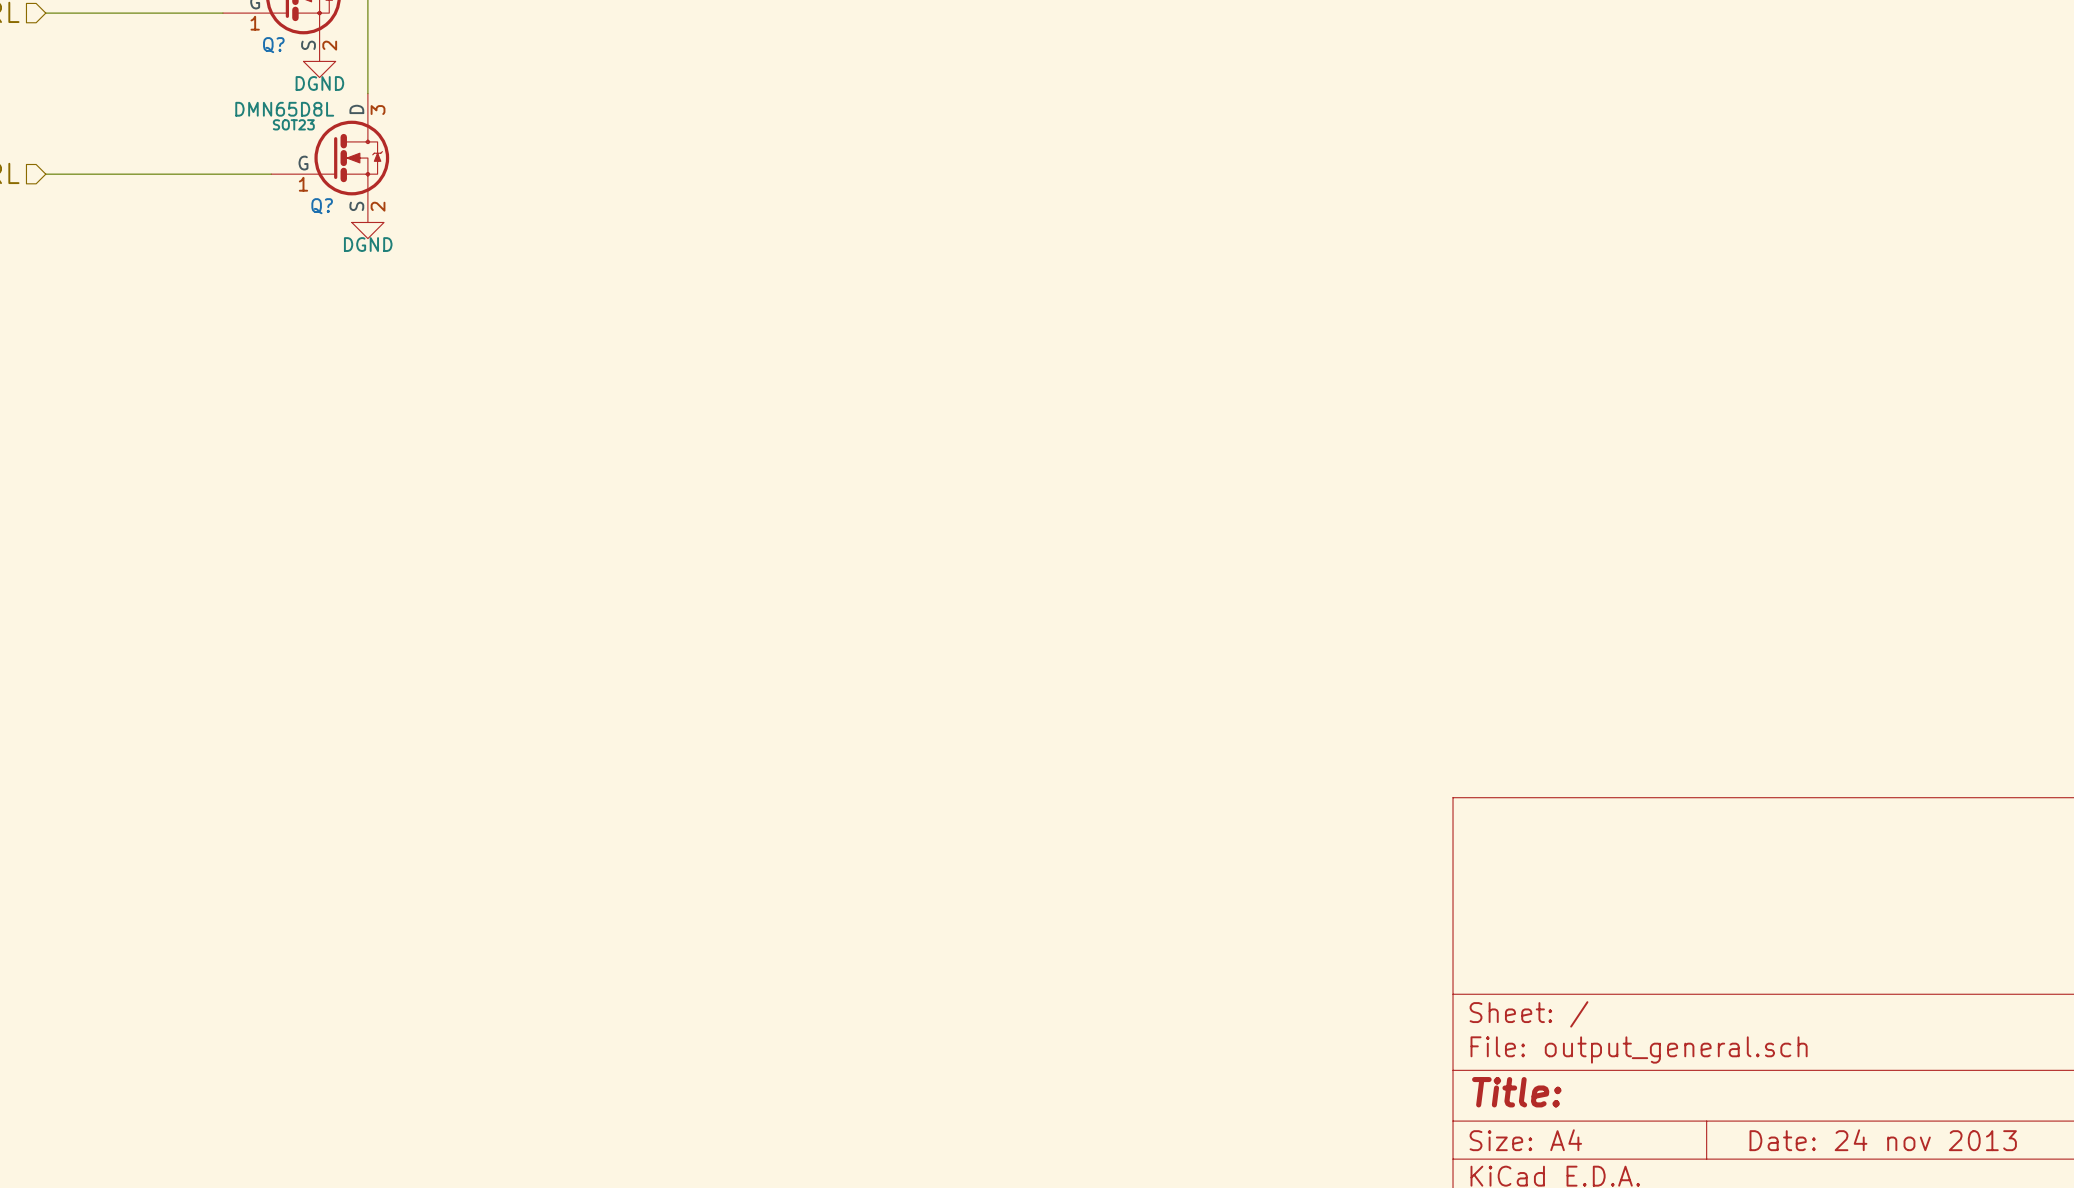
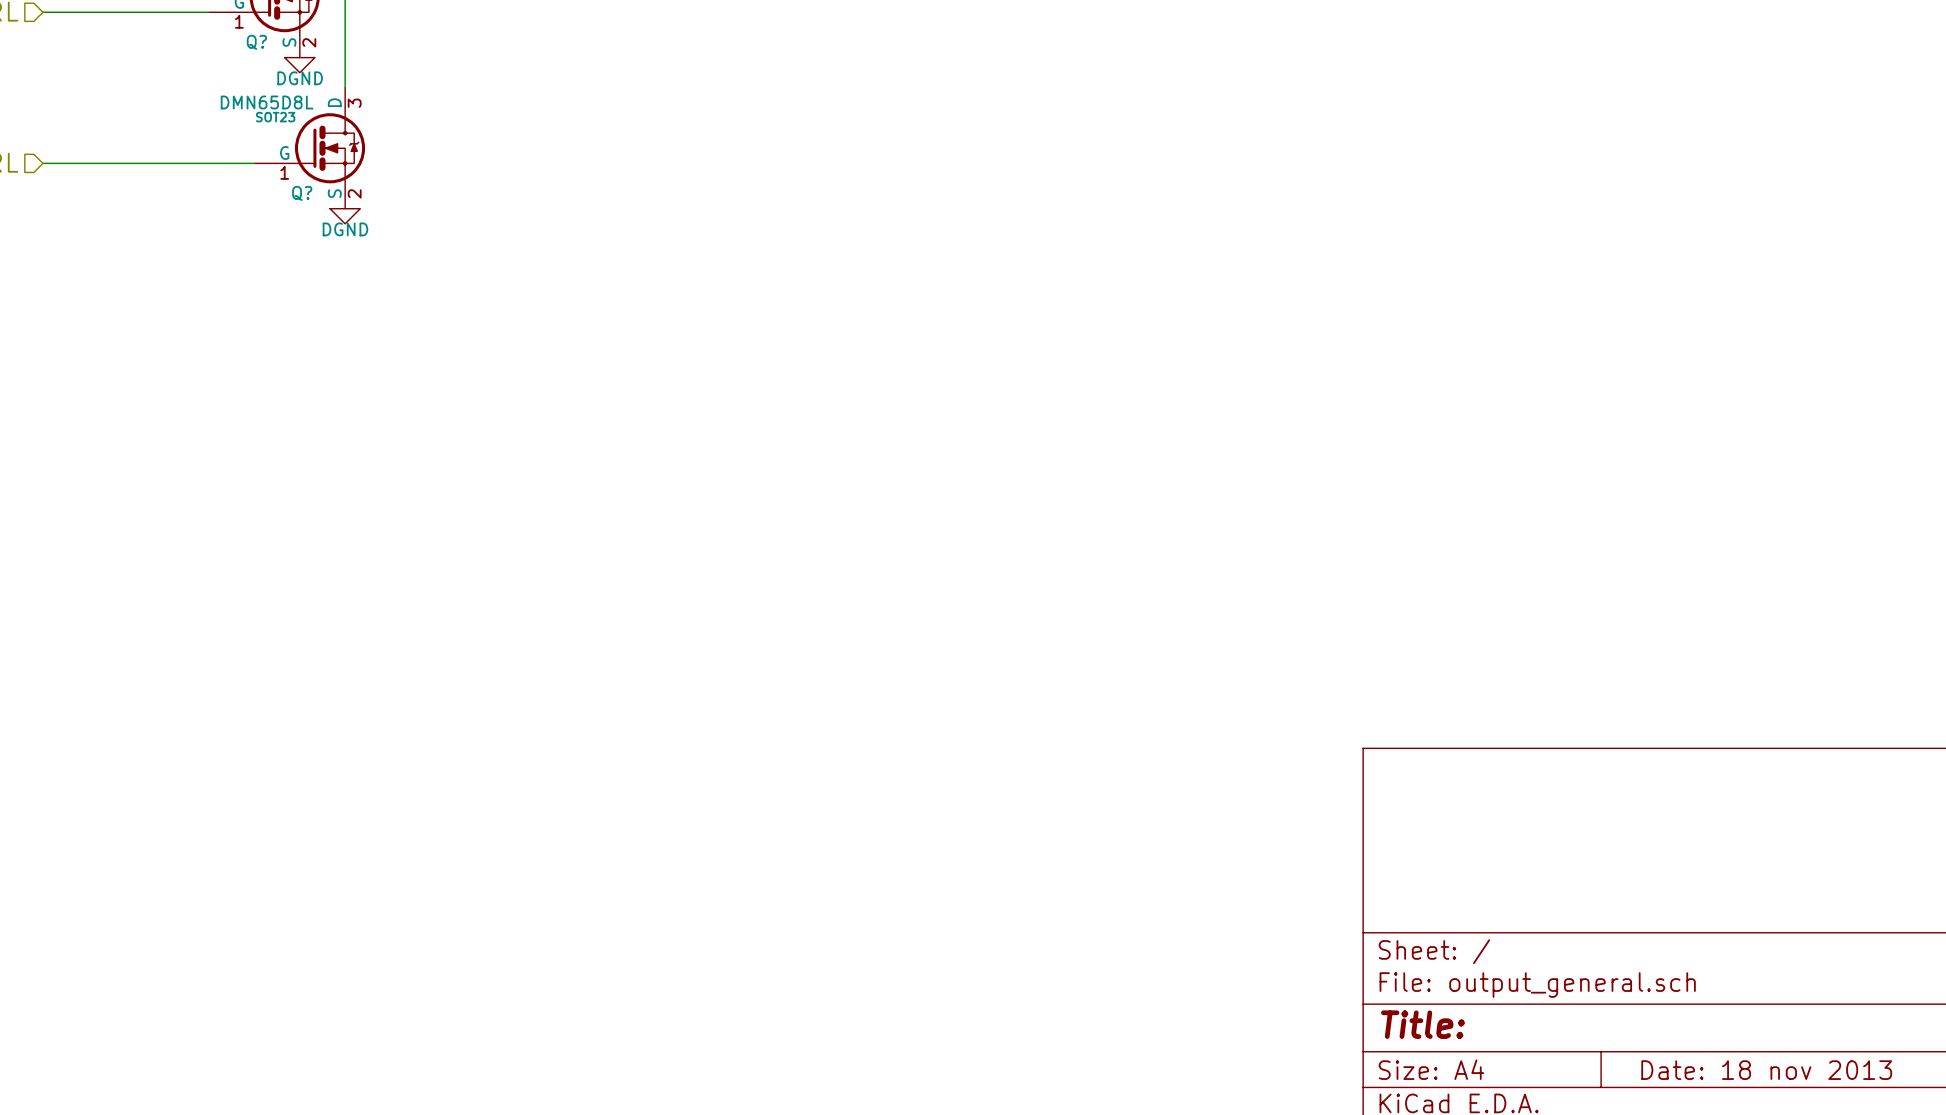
title block: Date: 24 nov 2013 (1883, 1140) -> Date: 18 nov 2013 (1766, 1070)

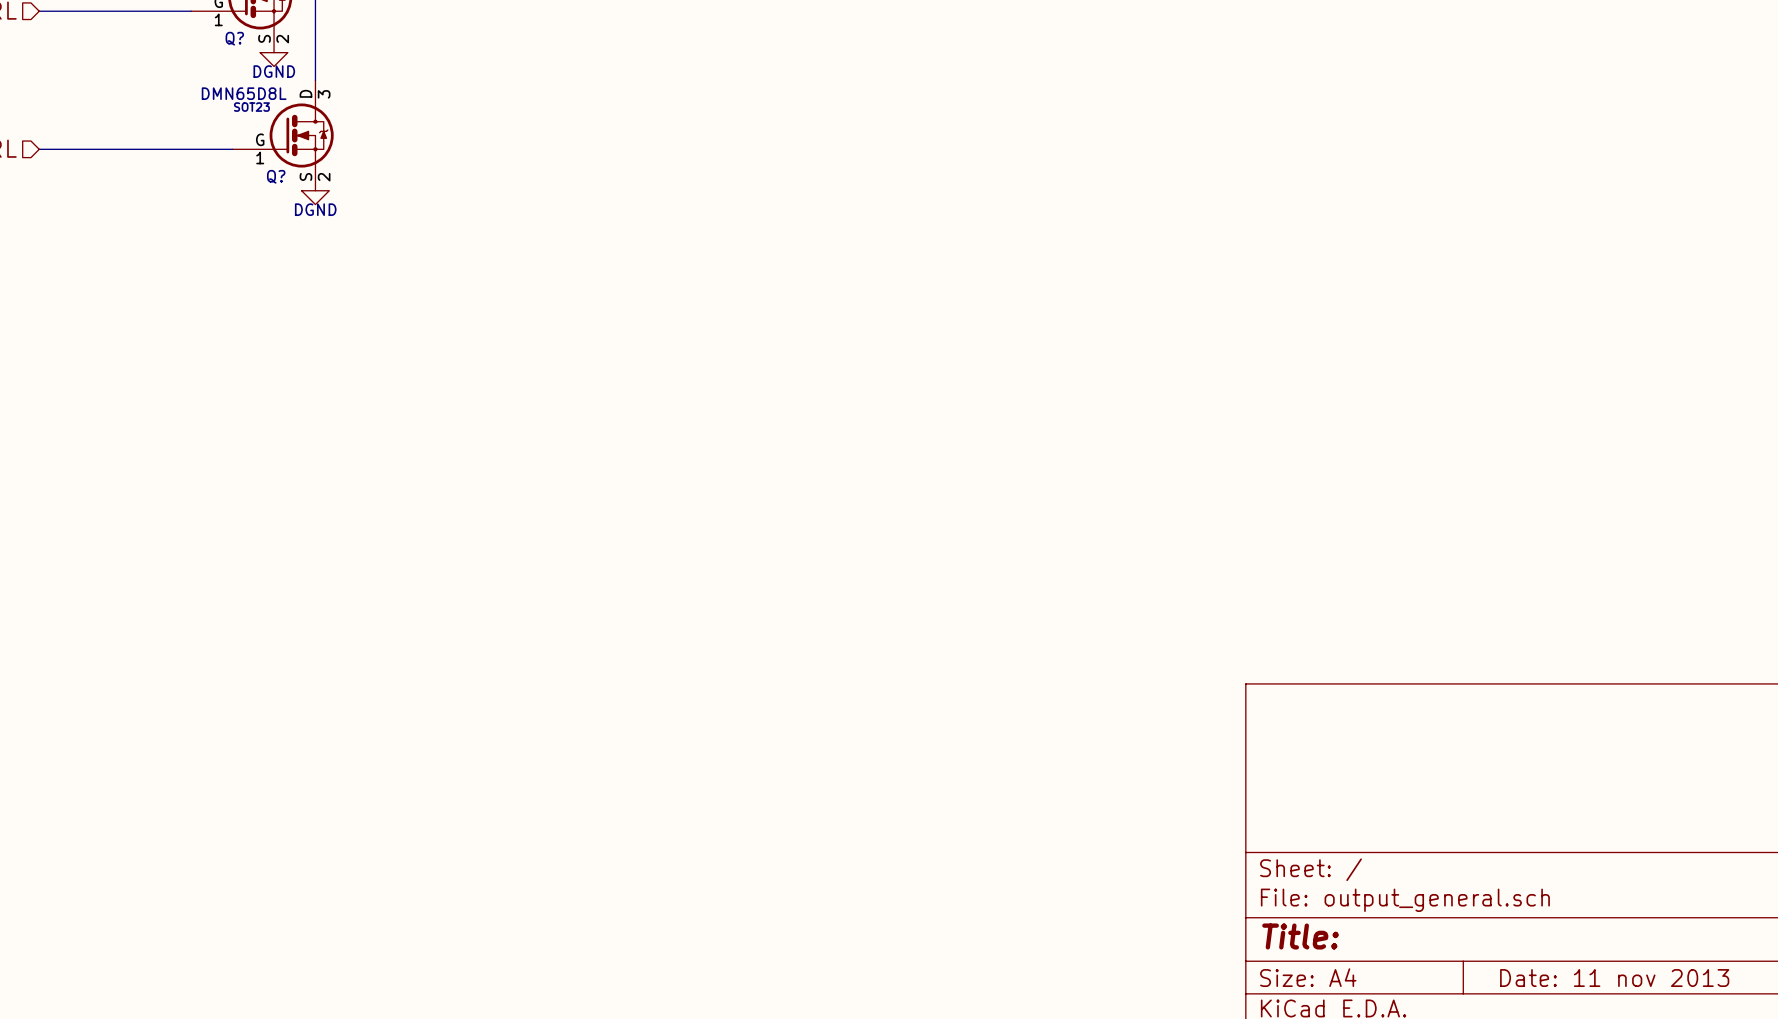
title block: Date: 18 nov 2013 (1766, 1070) -> Date: 11 nov 2013 (1614, 978)

